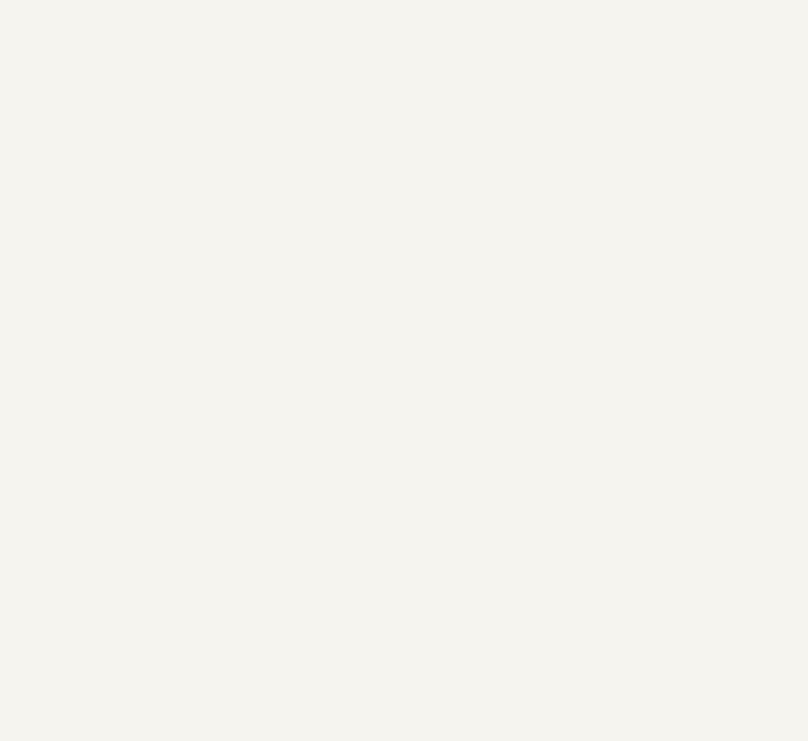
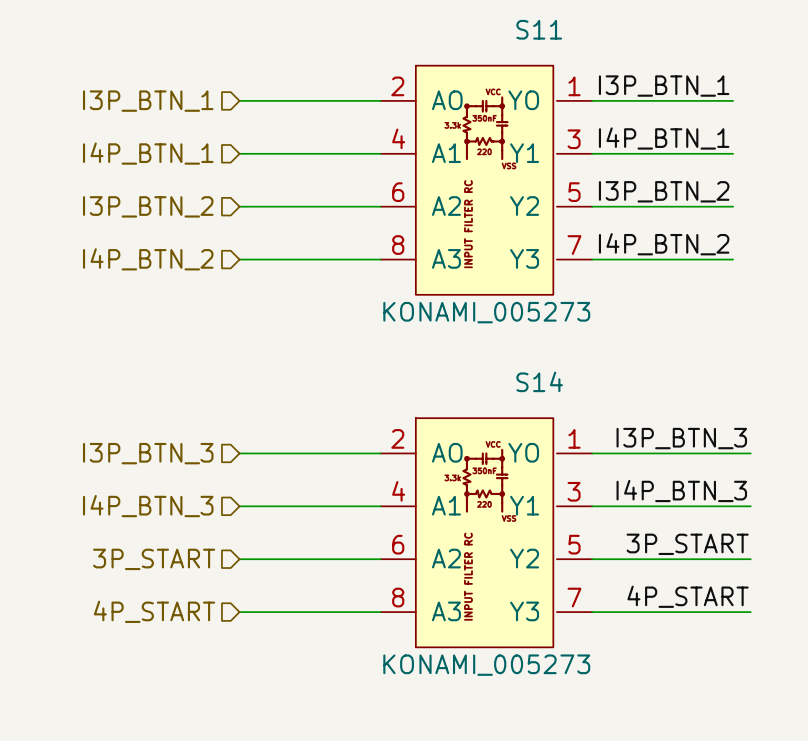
label: none -> I3P_BTN_1 (664, 86)
hierarchical label: none -> I3P_BTN_1 (148, 101)
wire: none -> (239, 100) (380, 100)
wire: none -> (592, 100) (733, 100)
label: none -> I4P_BTN_1 (664, 138)
hierarchical label: none -> I4P_BTN_1 (148, 153)
wire: none -> (239, 153) (380, 153)
wire: none -> (592, 153) (733, 153)
S11: none -> KONAMI_005273 (486, 180)
label: none -> I3P_BTN_2 (664, 191)
hierarchical label: none -> I3P_BTN_2 (148, 206)
wire: none -> (239, 206) (380, 206)
wire: none -> (592, 206) (733, 206)
label: none -> I4P_BTN_2 (664, 244)
hierarchical label: none -> I4P_BTN_2 (148, 259)
wire: none -> (239, 259) (380, 259)
wire: none -> (592, 259) (733, 259)
label: none -> I3P_BTN_3 (681, 438)
hierarchical label: none -> I3P_BTN_3 (148, 453)
wire: none -> (239, 453) (380, 453)
wire: none -> (592, 453) (750, 453)
label: none -> I4P_BTN_3 (681, 491)
hierarchical label: none -> I4P_BTN_3 (148, 506)
wire: none -> (239, 506) (380, 506)
wire: none -> (592, 506) (750, 506)
S14: none -> KONAMI_005273 (486, 532)
label: none -> 3P_START (687, 544)
hierarchical label: none -> 3P_START (154, 559)
wire: none -> (239, 559) (380, 559)
wire: none -> (592, 559) (750, 559)
label: none -> 4P_START (688, 596)
hierarchical label: none -> 4P_START (154, 611)
wire: none -> (239, 612) (380, 612)
wire: none -> (592, 612) (750, 612)

